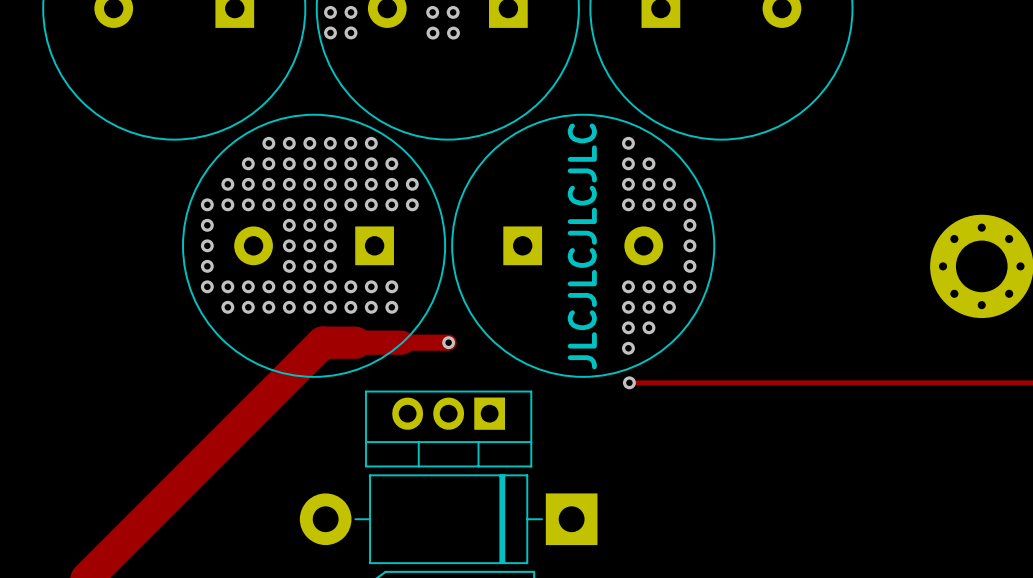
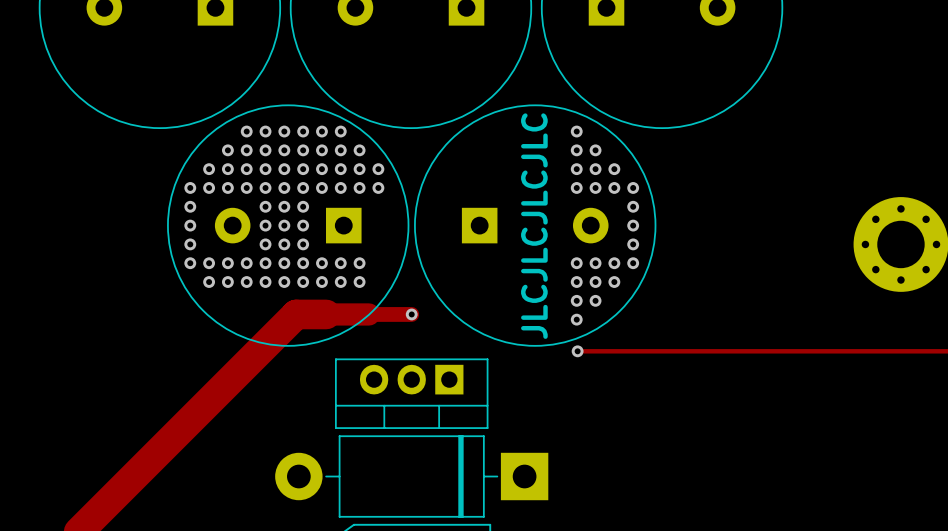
via: (330, 12) -> none
via: (350, 12) -> none
via: (432, 12) -> none
via: (453, 12) -> none
via: (330, 32) -> none
via: (350, 32) -> none
via: (432, 33) -> none
via: (453, 33) -> none

